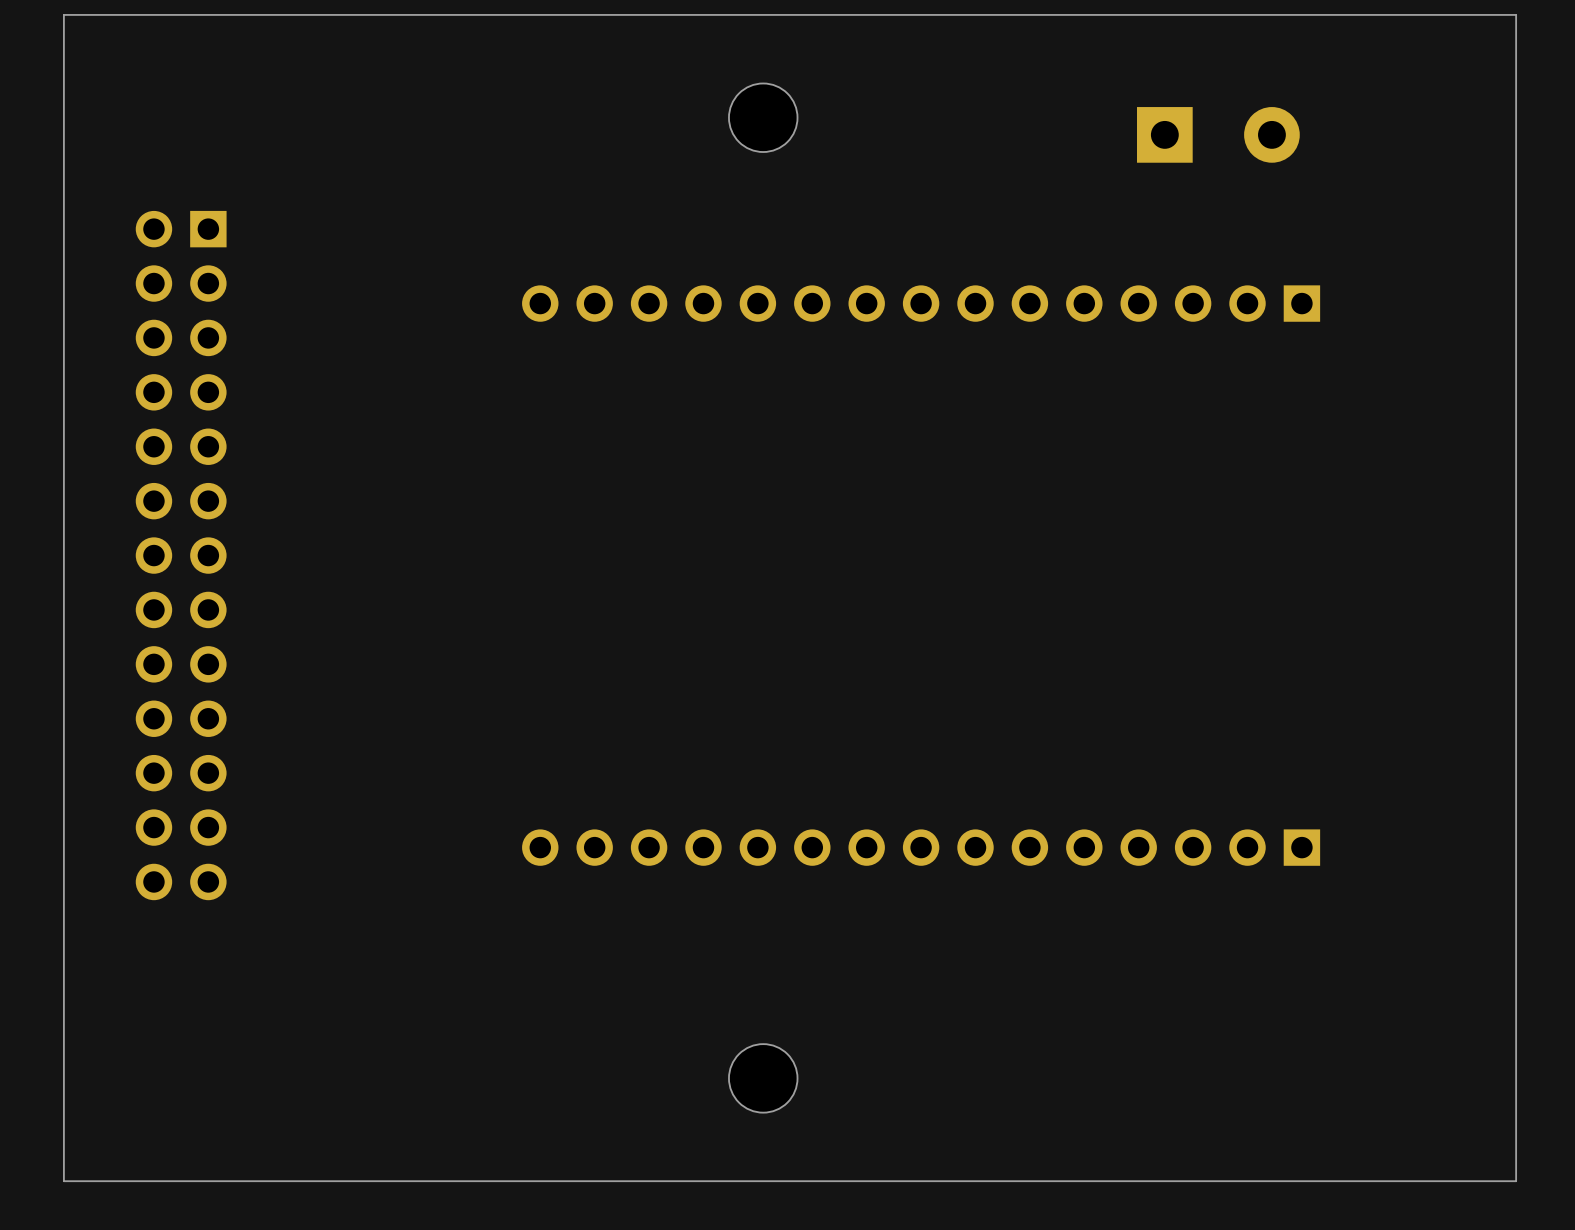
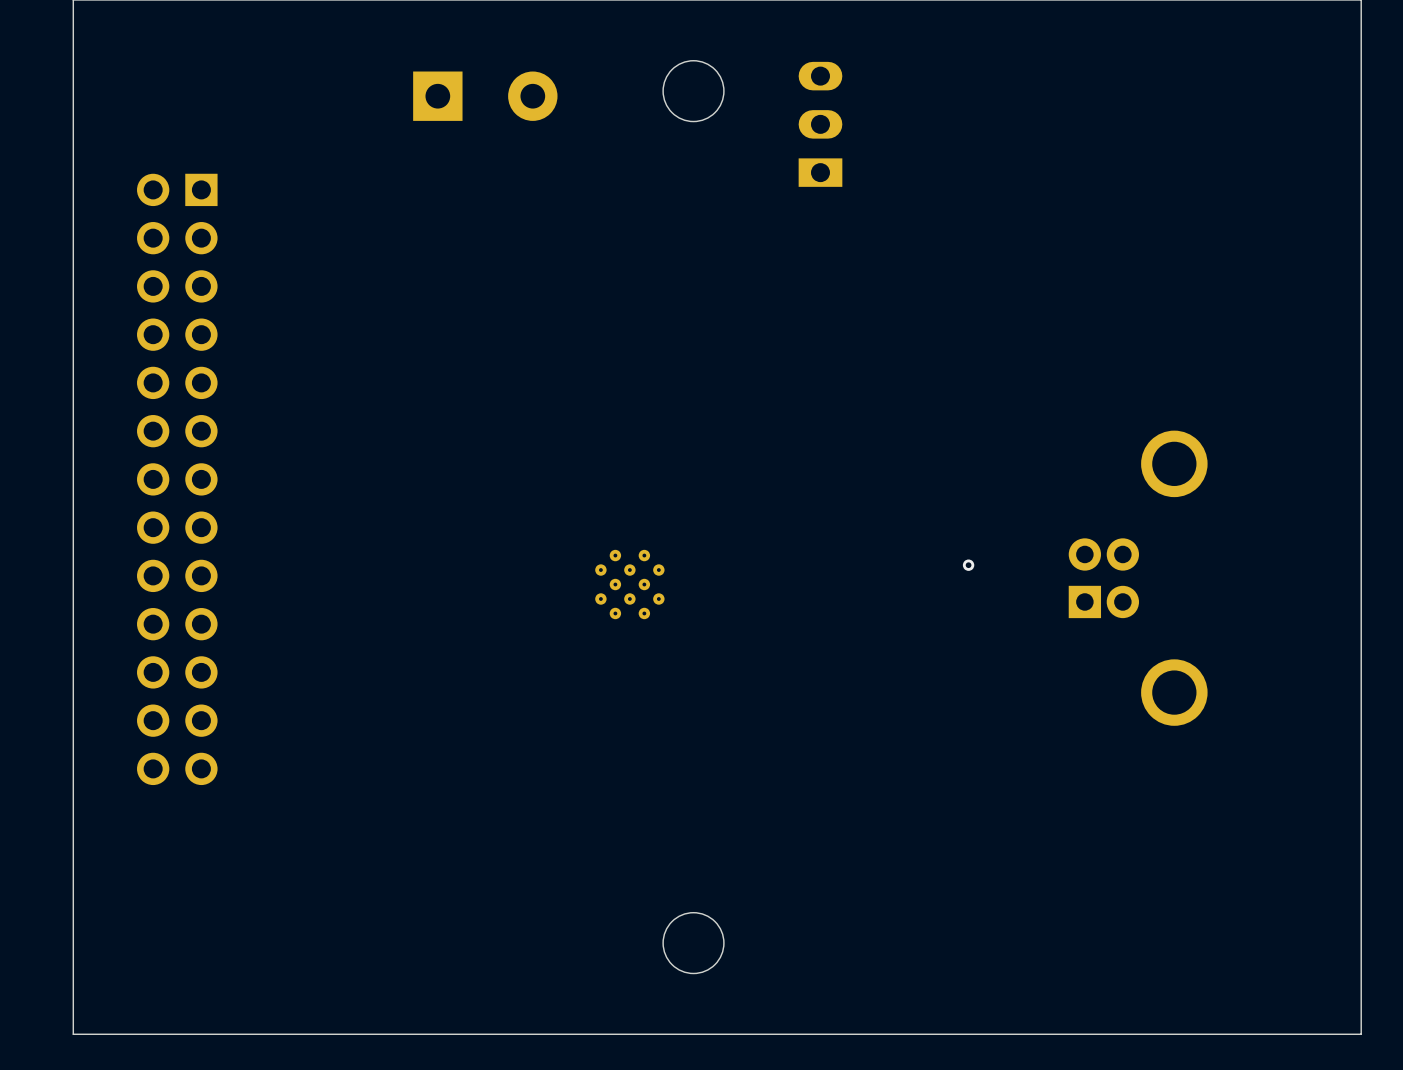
part: none -> (485, 96)
part: (1218, 134) -> none
part: none -> (820, 124)
part: (921, 303) -> none
via: none -> (968, 565)
part: none -> (1138, 578)
part: none -> (629, 584)
part: (921, 847) -> none

